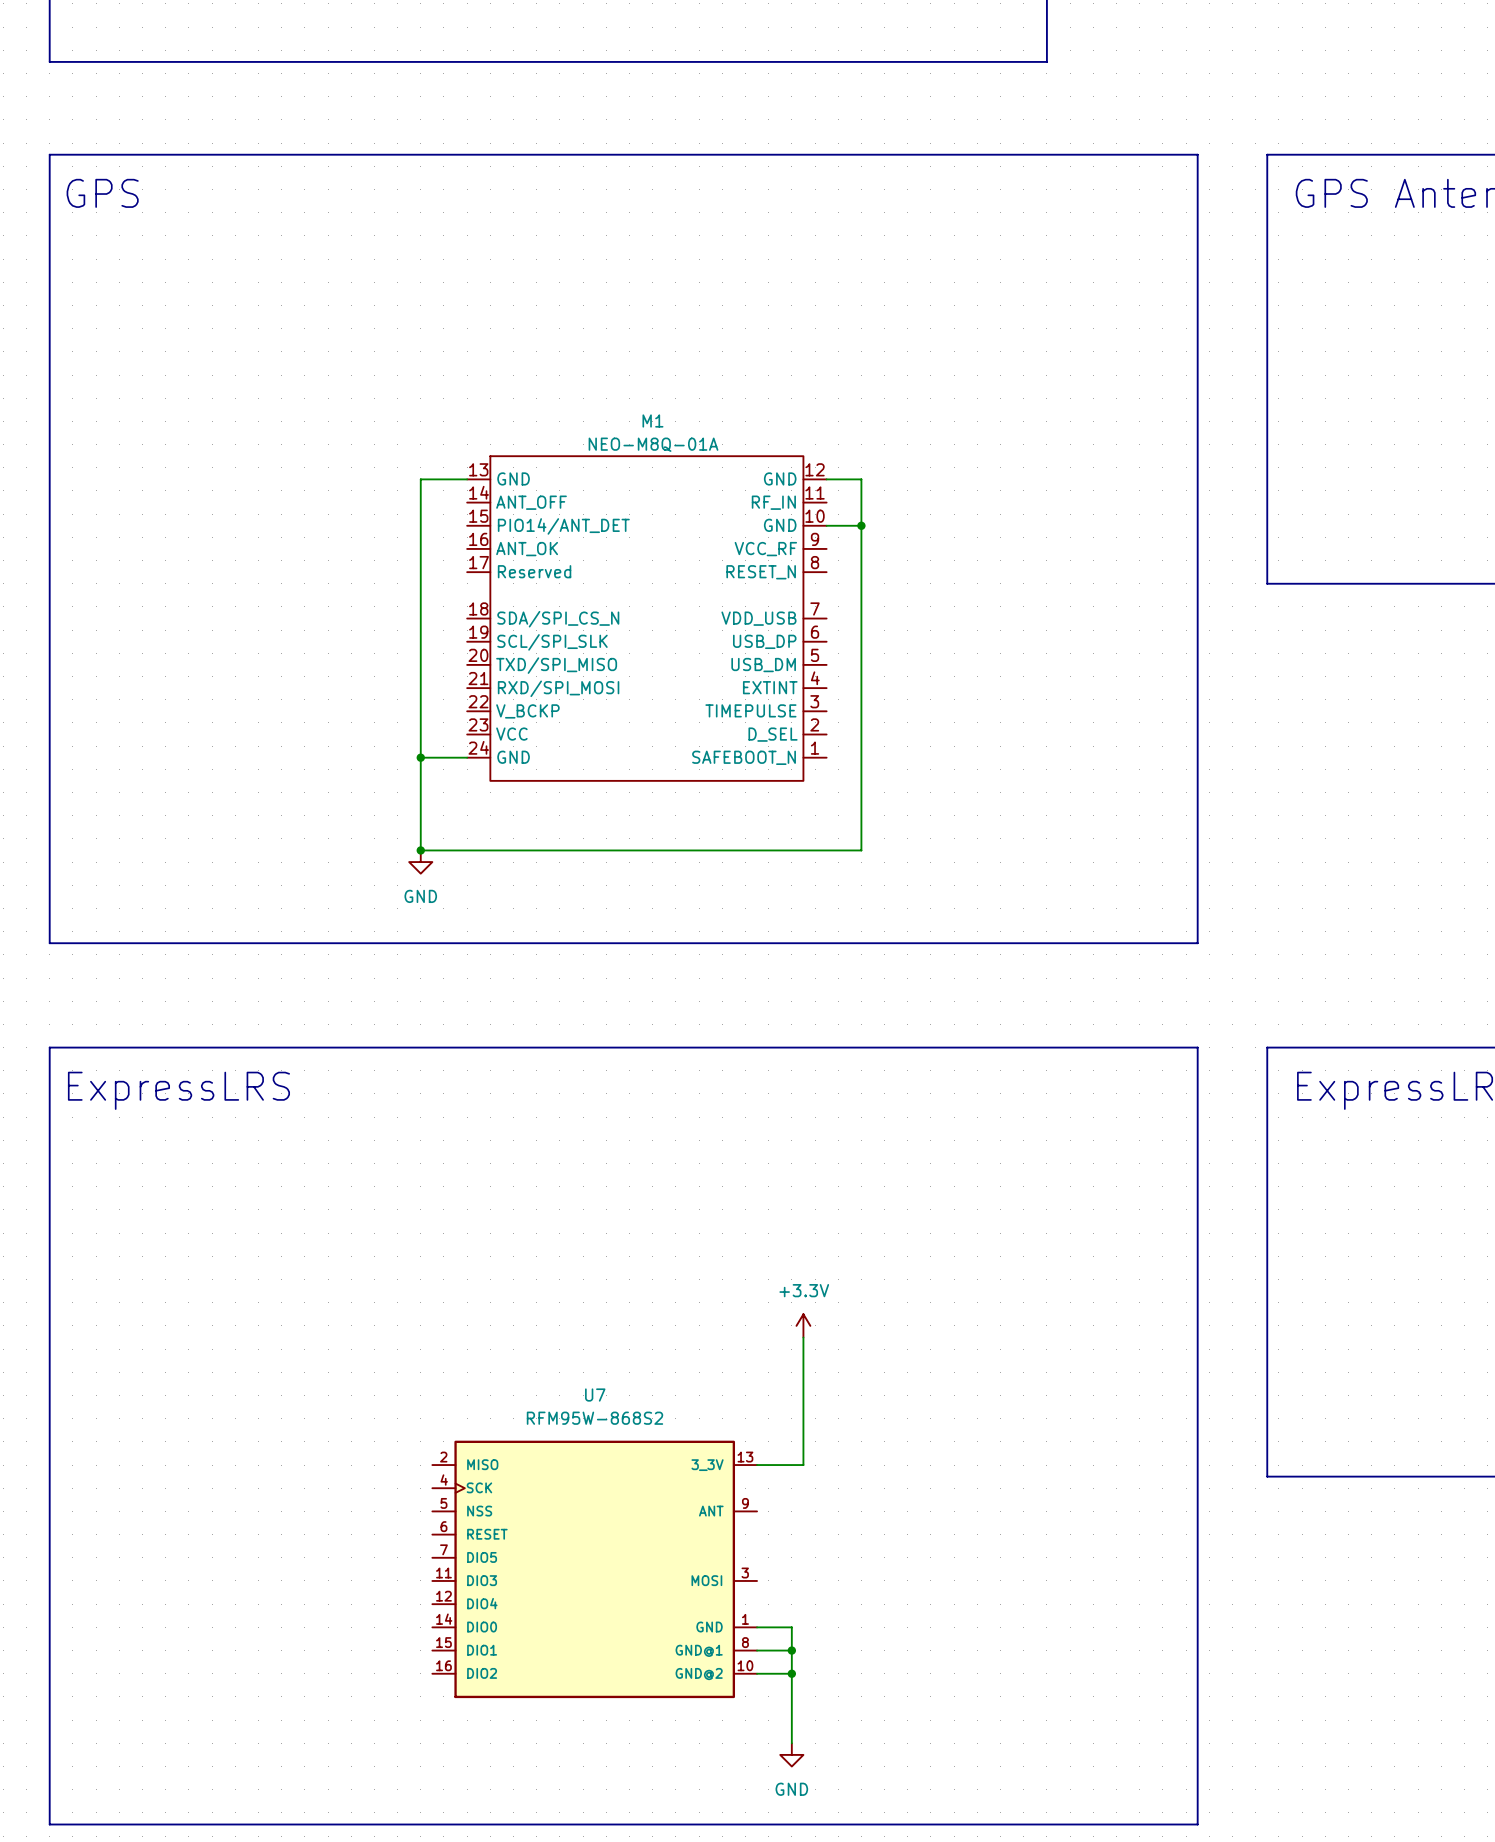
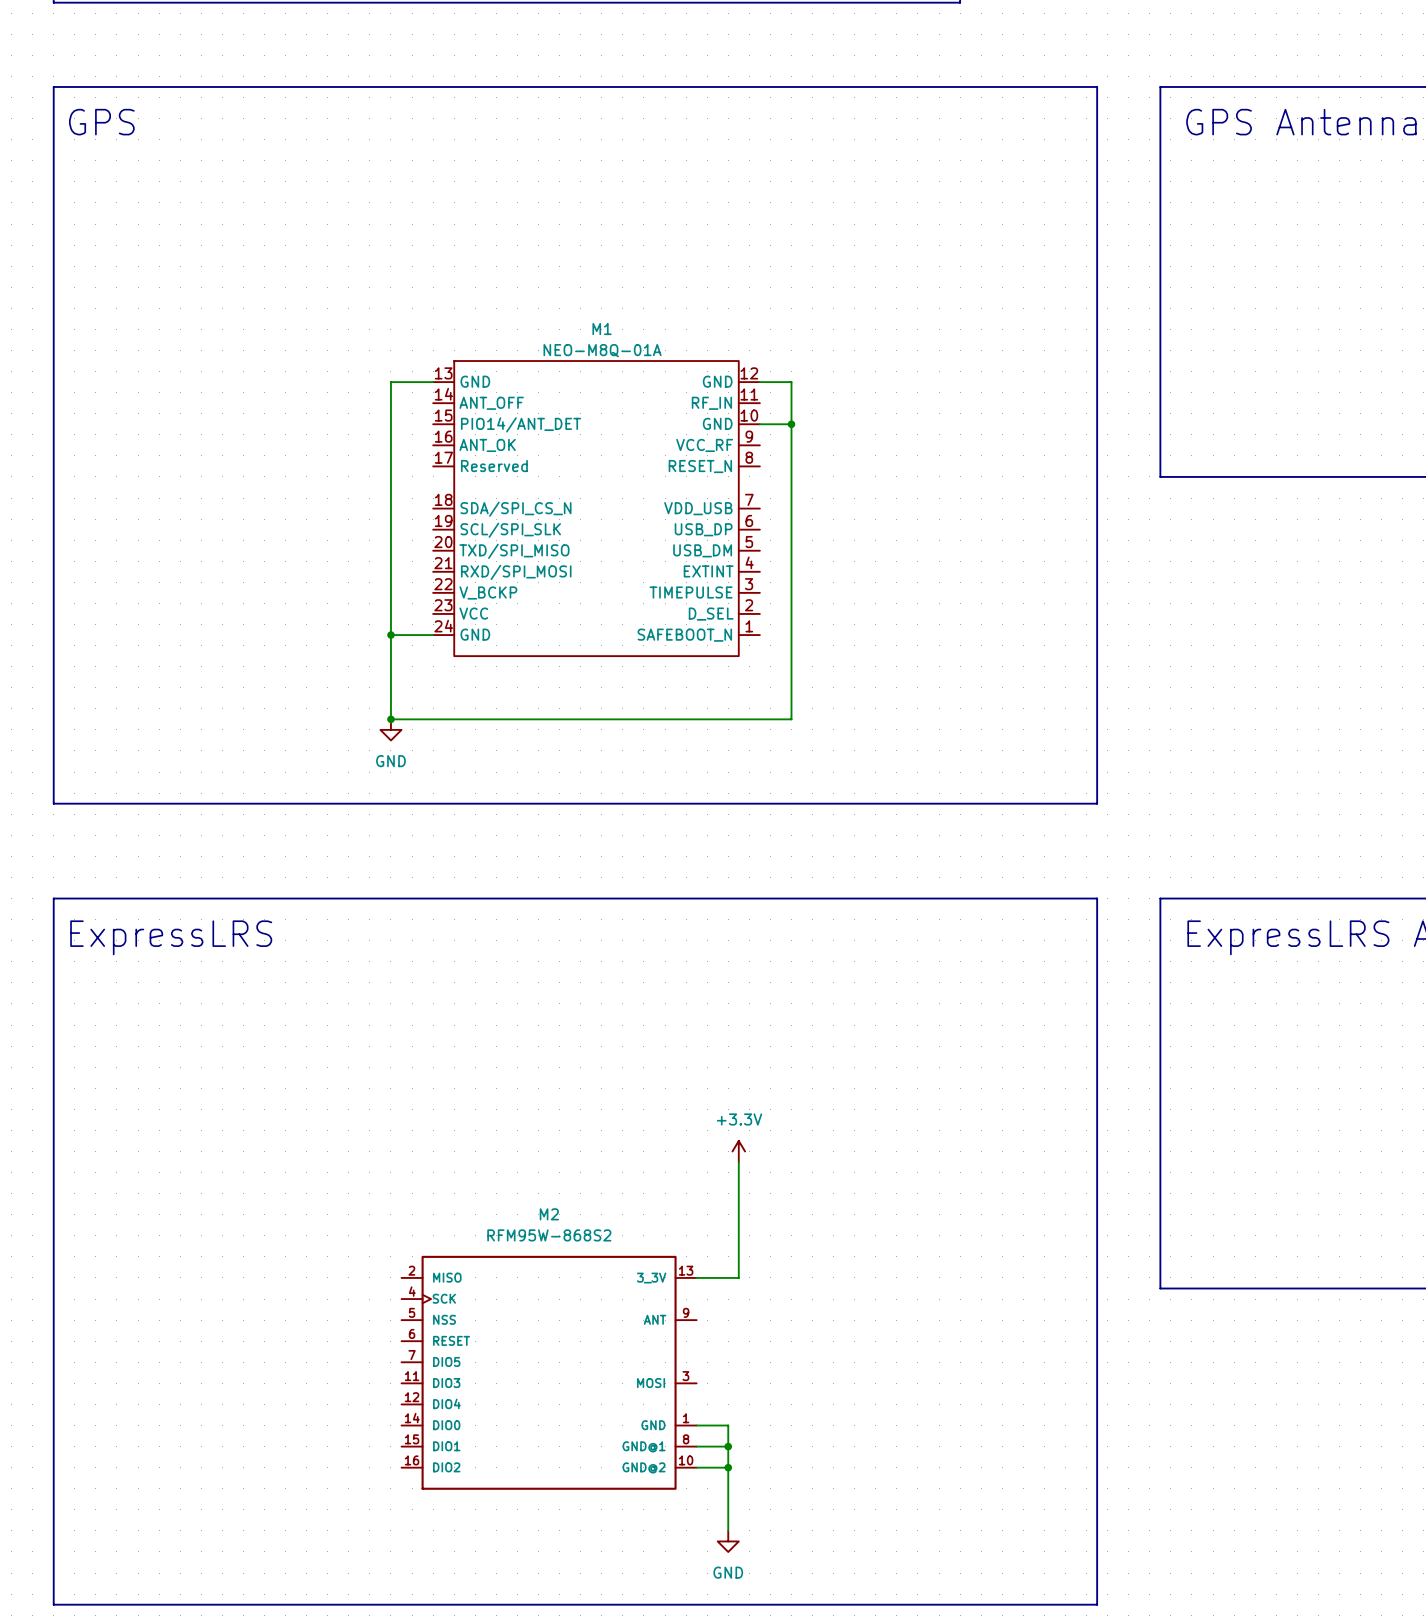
U7: RFM95W-868S2 (594, 1569) -> none
M2: none -> RFM95W-868S2 (549, 1372)

